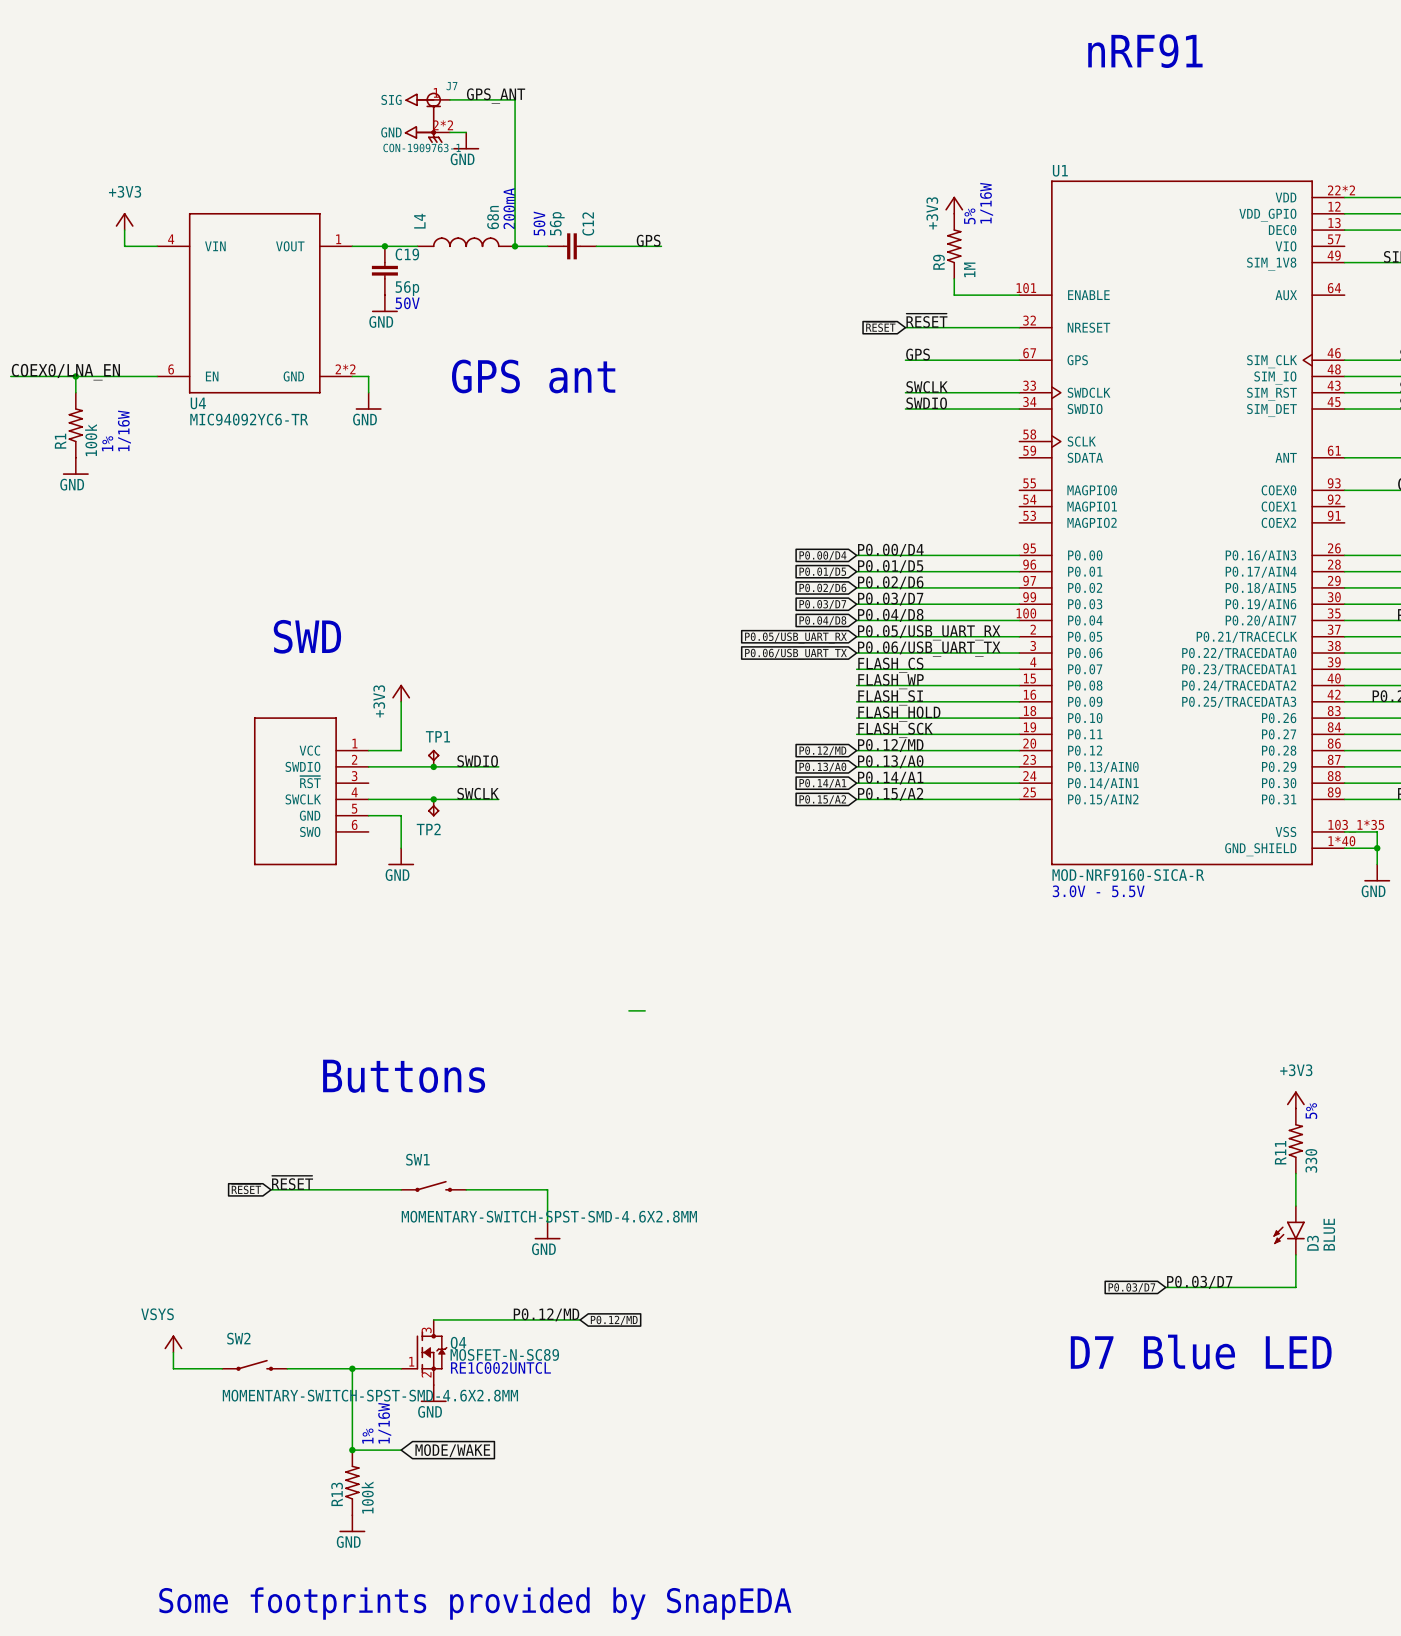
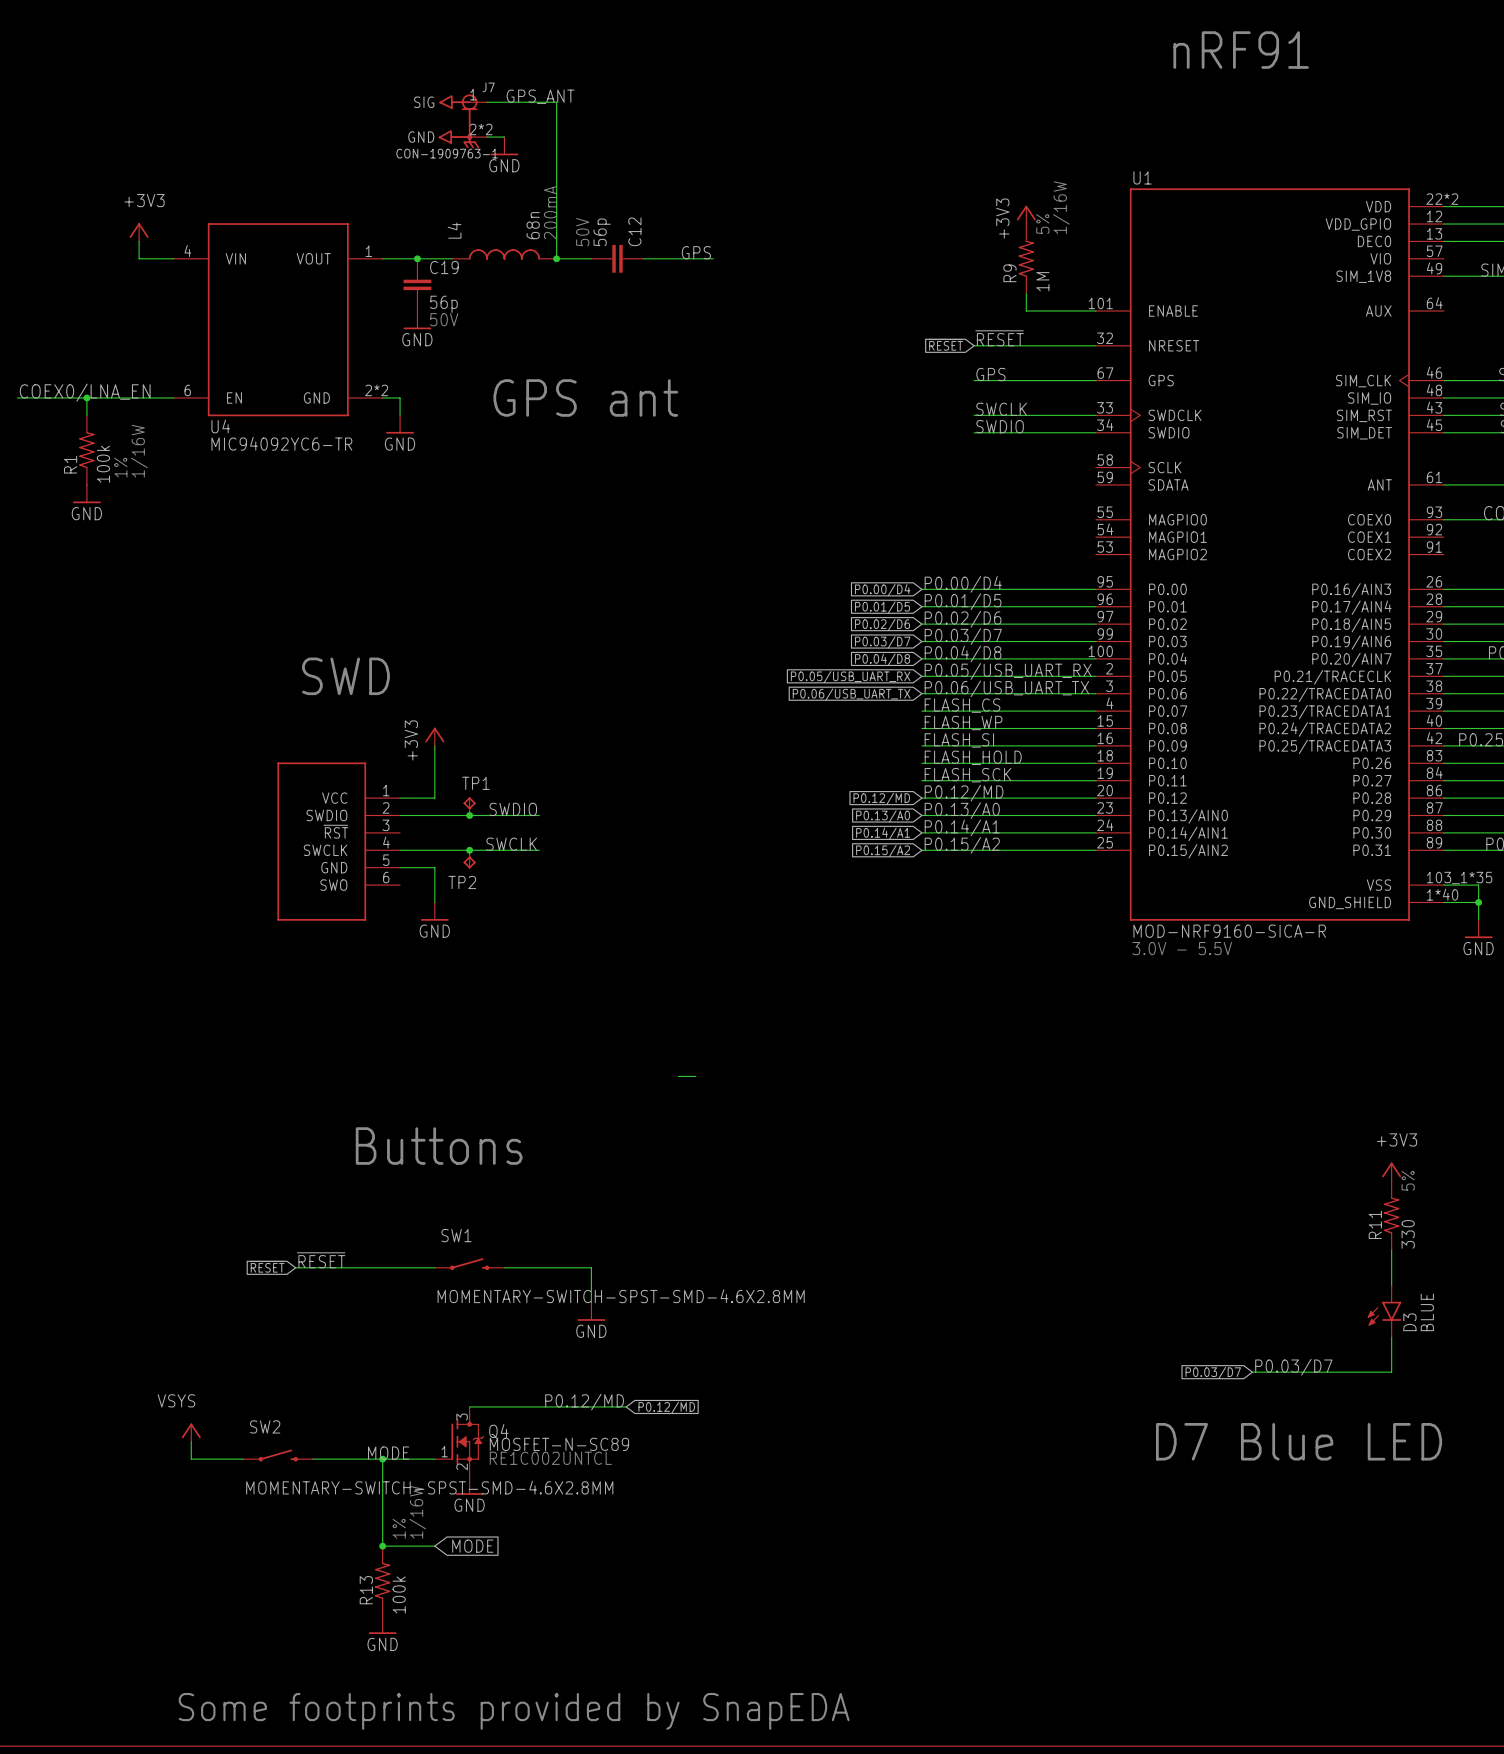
label: none -> MODE (388, 1453)
global label: MODE/WAKE (452, 1450) -> MODE (472, 1546)

